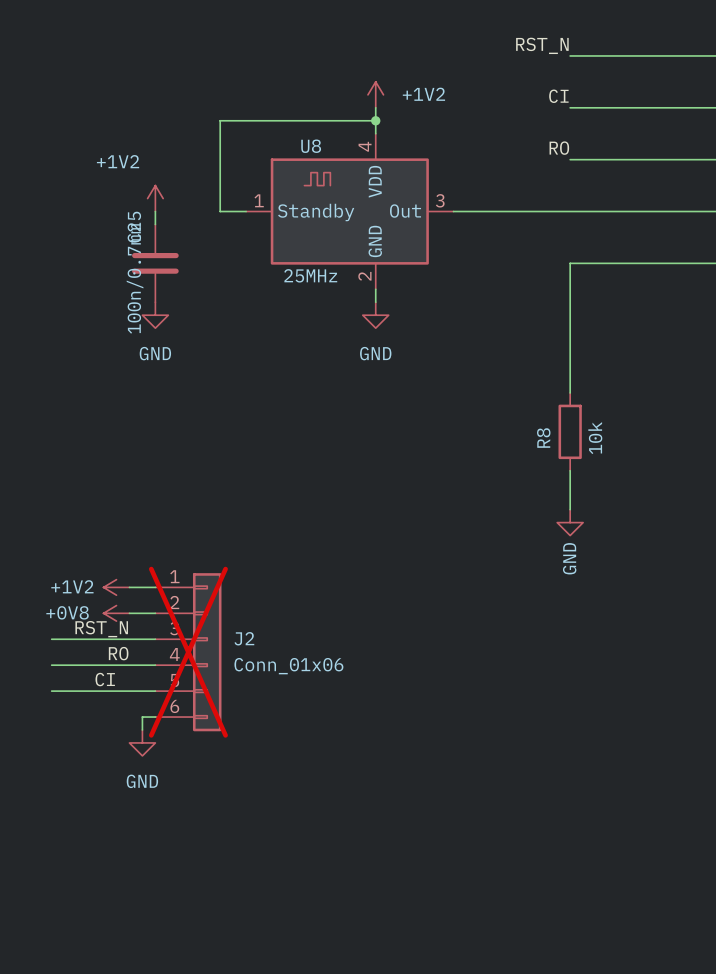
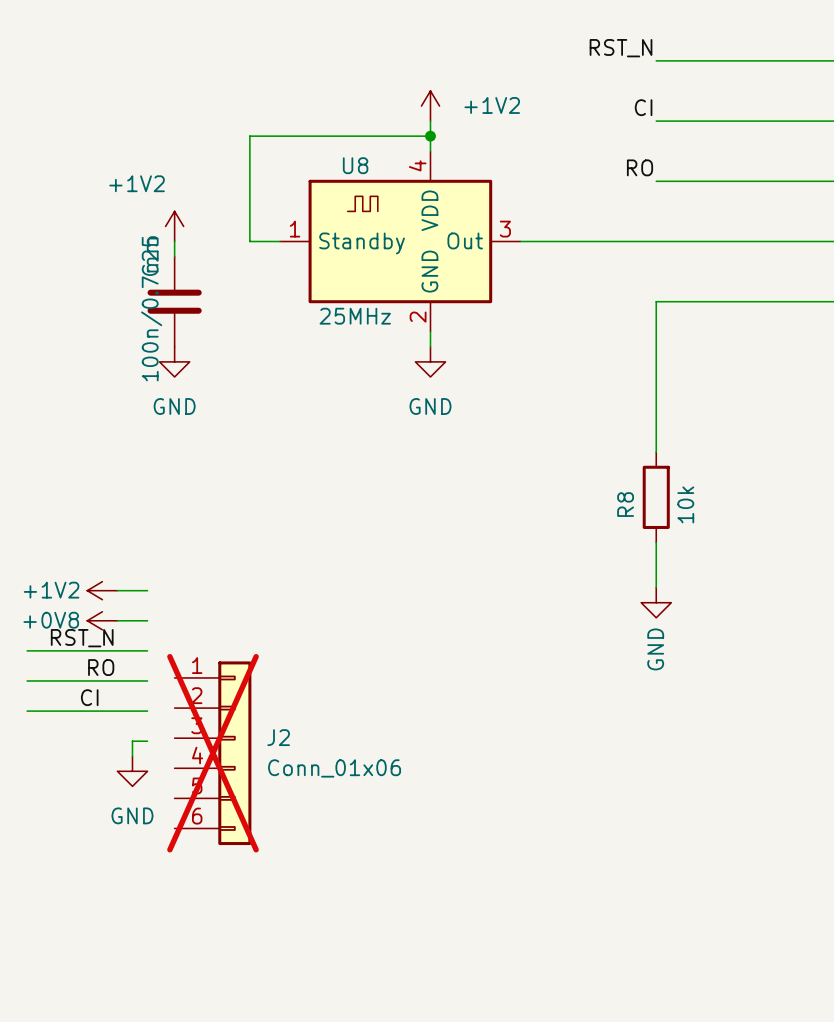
power symbol position: +1V2 (116, 587) -> +1V2 (102, 590)
wire: (129, 587) (155, 587) -> (117, 590) (147, 590)
power symbol position: +0V8 (116, 613) -> +0V8 (102, 620)
wire: (129, 613) (155, 613) -> (117, 620) (147, 620)
label position: RST_N (101, 629) -> RST_N (82, 638)
wire: (51, 639) (155, 639) -> (27, 650) (147, 650)
label position: RO (118, 653) -> RO (101, 667)
wire: (51, 665) (155, 665) -> (27, 680) (147, 680)
label position: CI (105, 679) -> CI (89, 697)
wire: (51, 691) (155, 691) -> (27, 711) (147, 711)
wire: (155, 717) (142, 717) (142, 729) -> (147, 741) (132, 741) (132, 756)
power symbol position: GND (142, 742) -> GND (132, 771)

